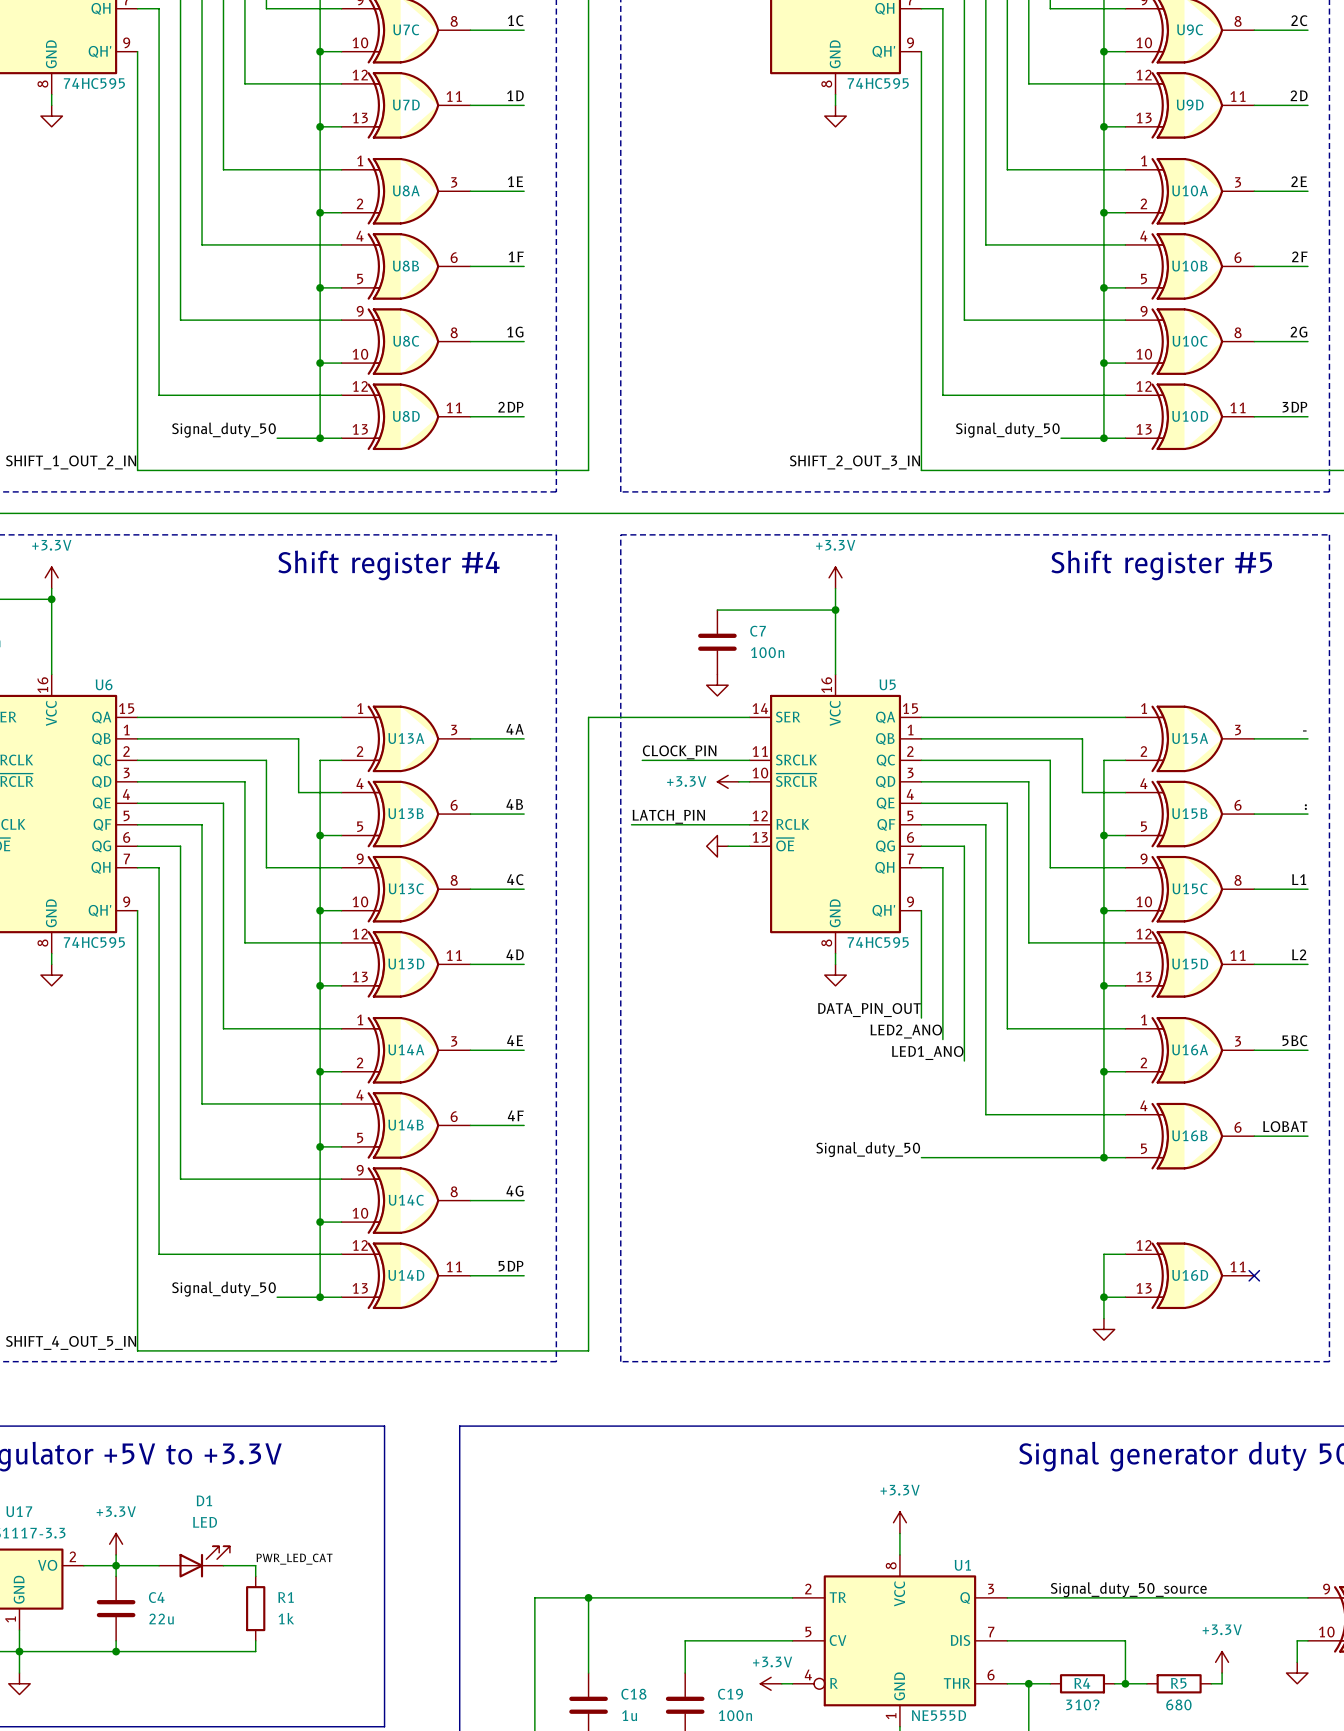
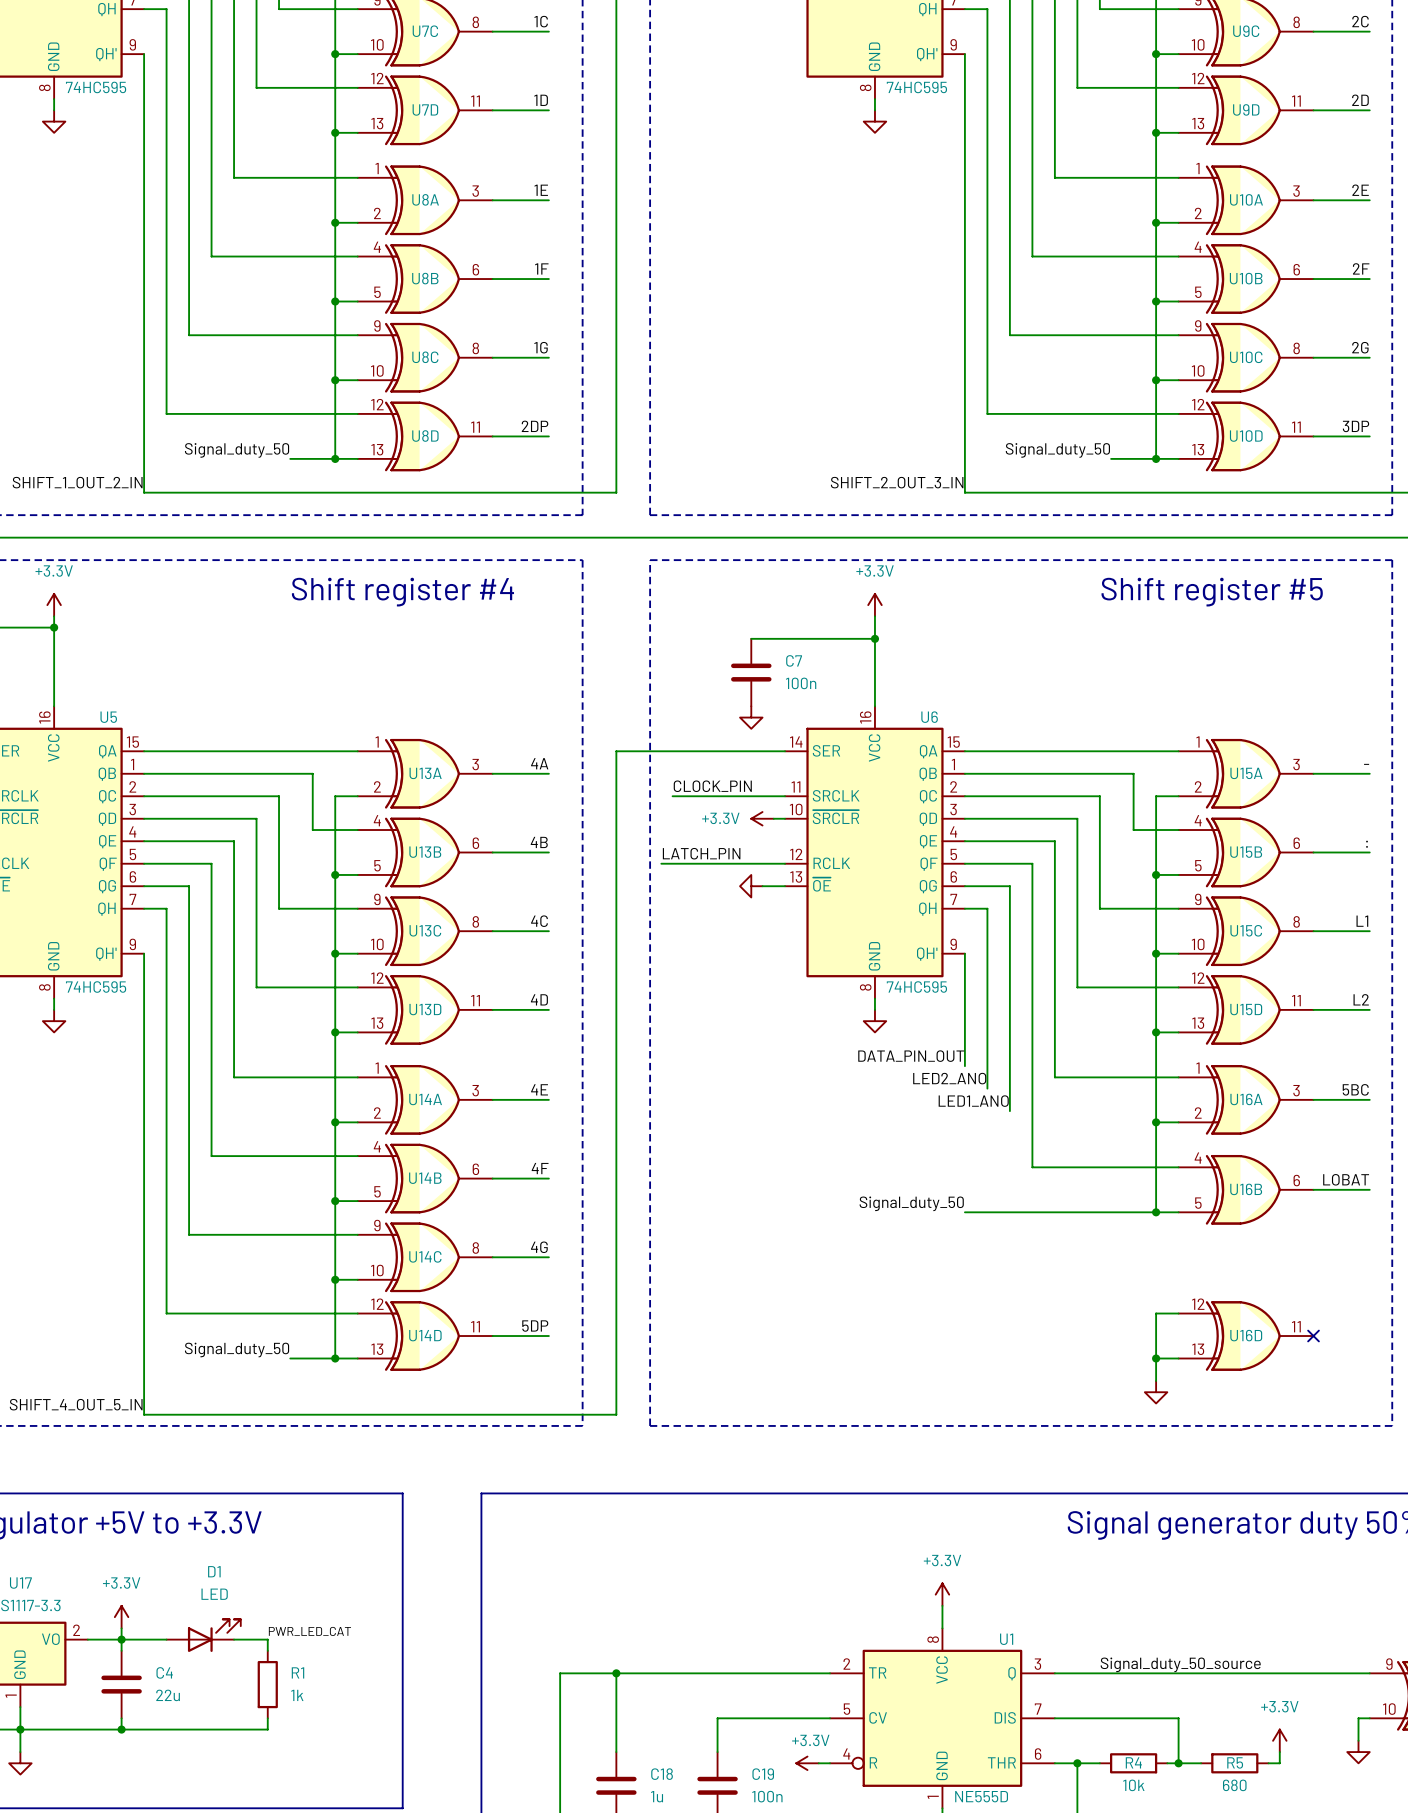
U6 name: U6 (104, 684) -> U5 (108, 717)
U5 name: U5 (887, 684) -> U6 (929, 717)
R4 value: 310? (1082, 1704) -> 10k (1133, 1785)

